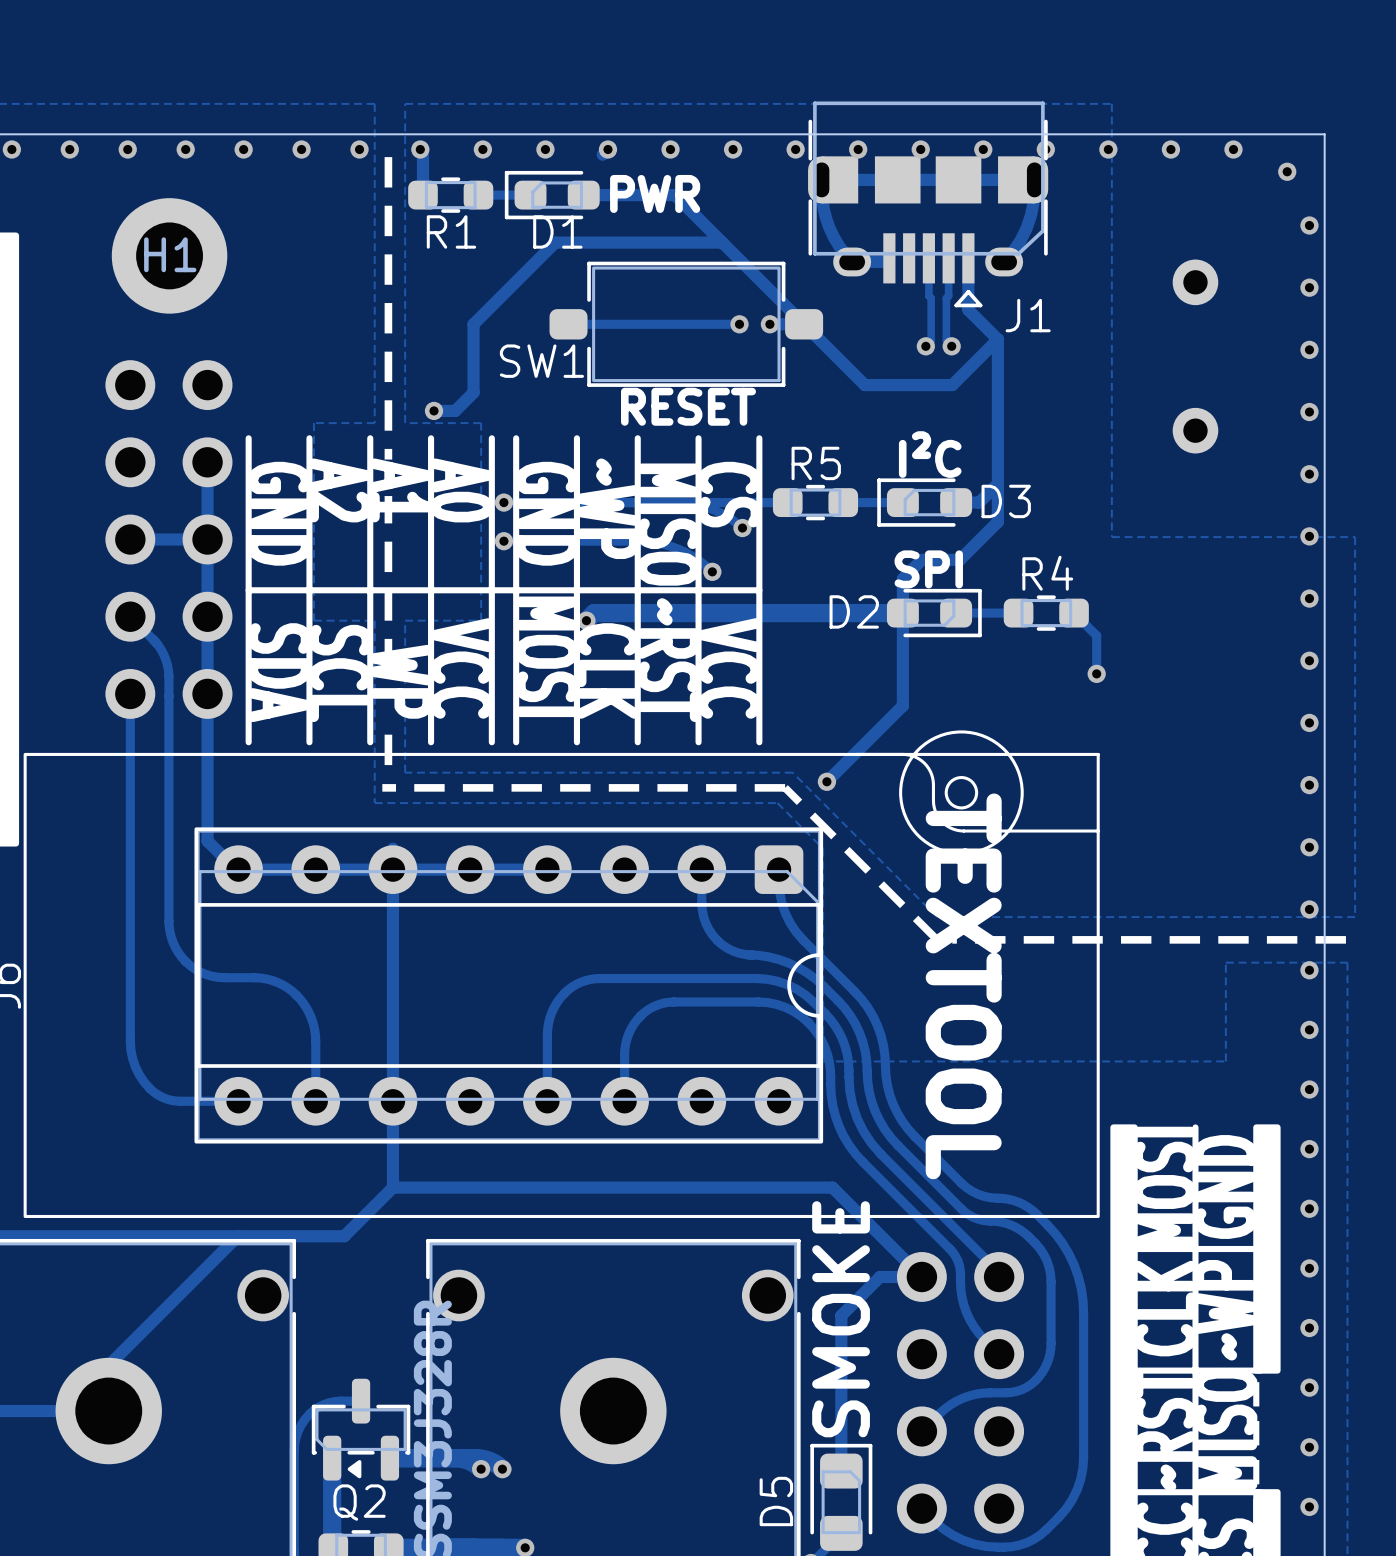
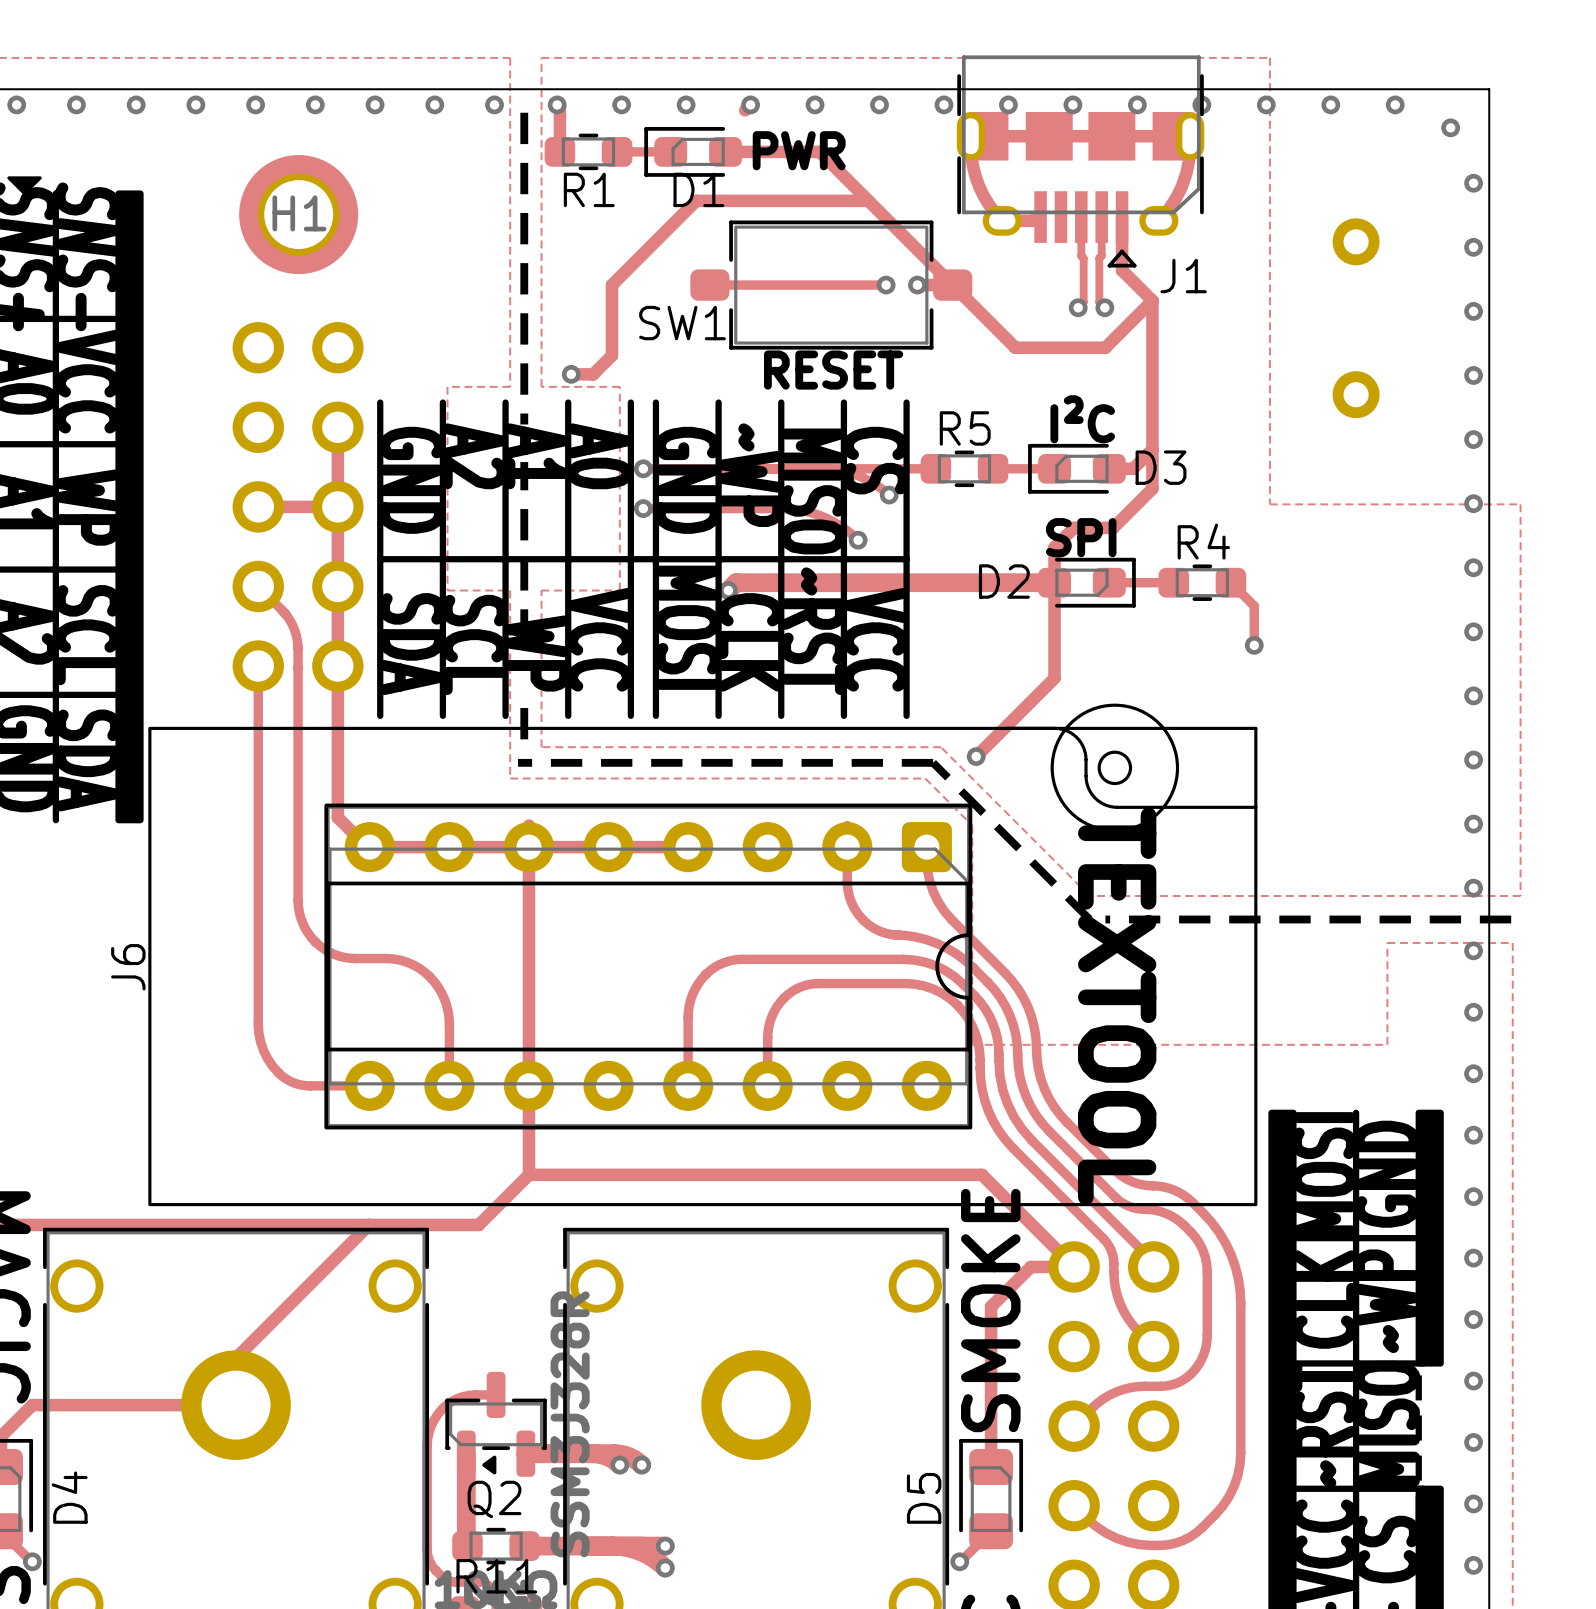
J6 text position: TEXTOOL (963, 986) -> TEXTOOL (1117, 1006)

